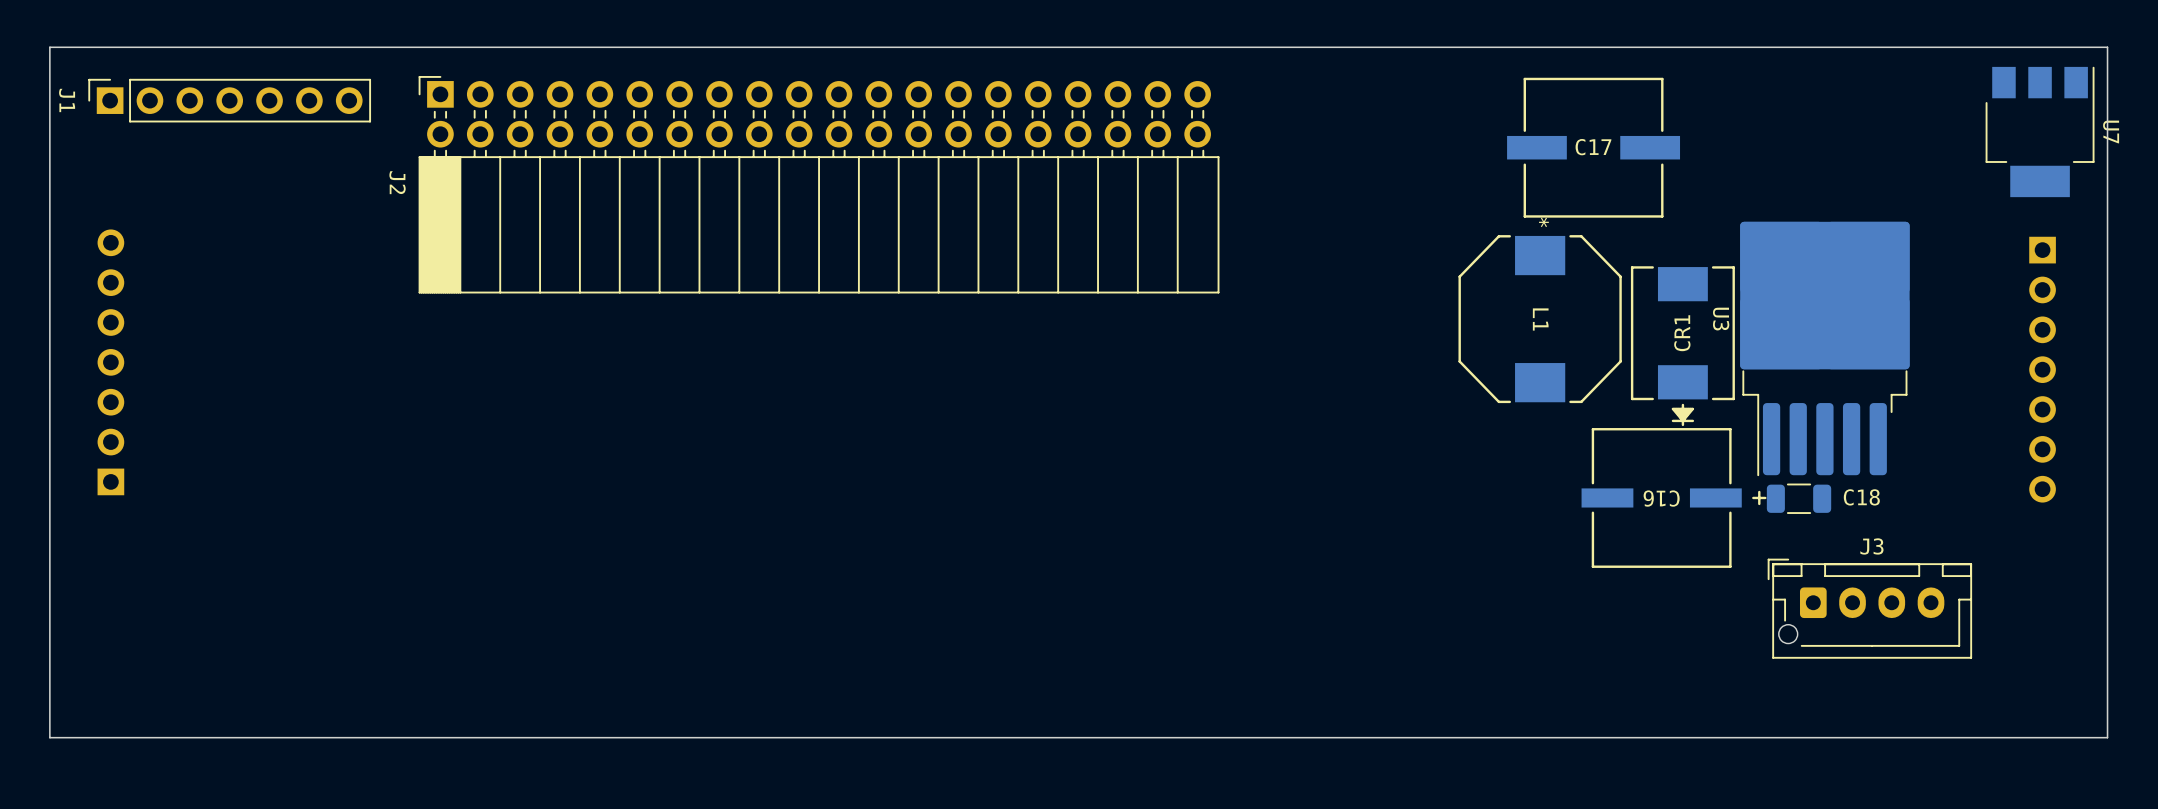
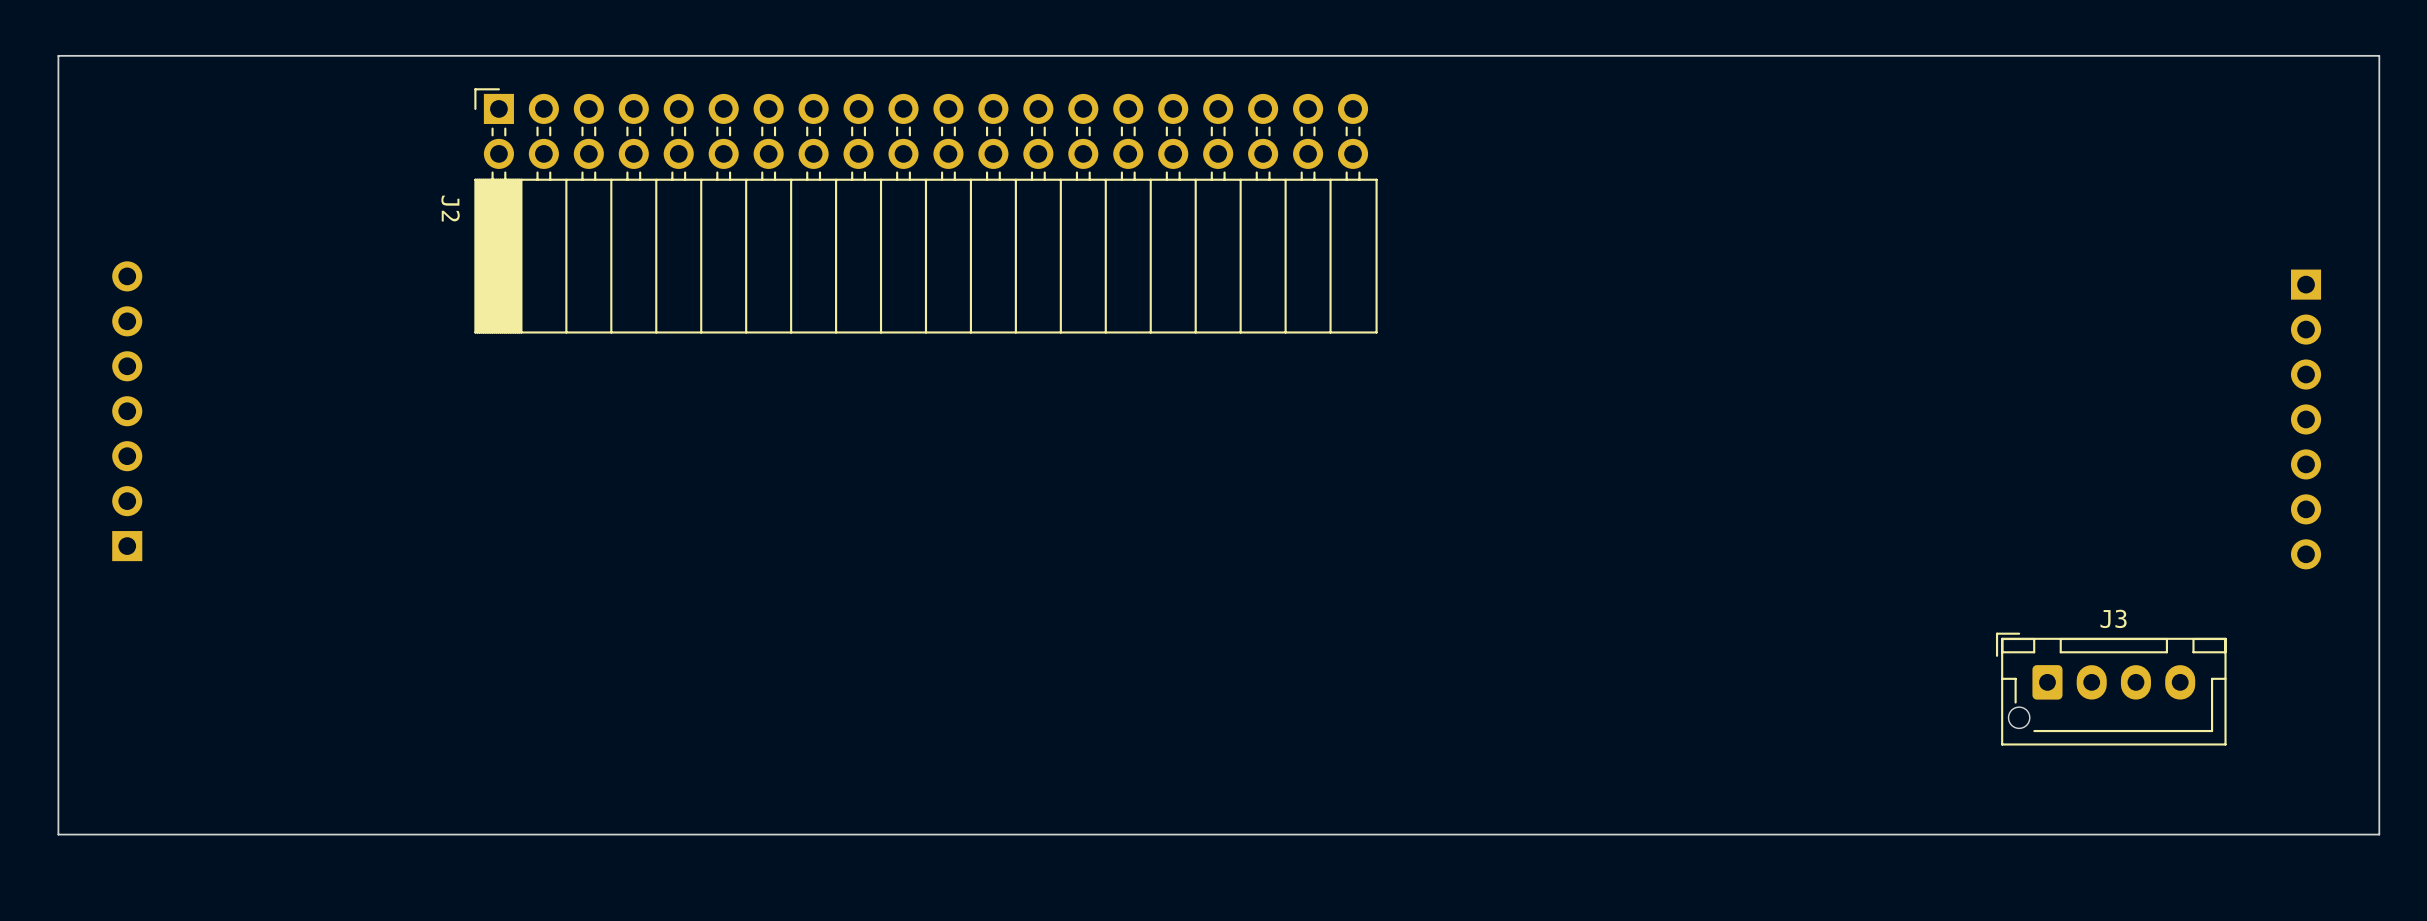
J1: (229, 100) -> none
U7: (2040, 131) -> none
C17: (1593, 147) -> none
L1: (1540, 319) -> none
CR1: (1682, 346) -> none
U3: (1824, 348) -> none
C16: (1674, 497) -> none
C18: (1799, 498) -> none

